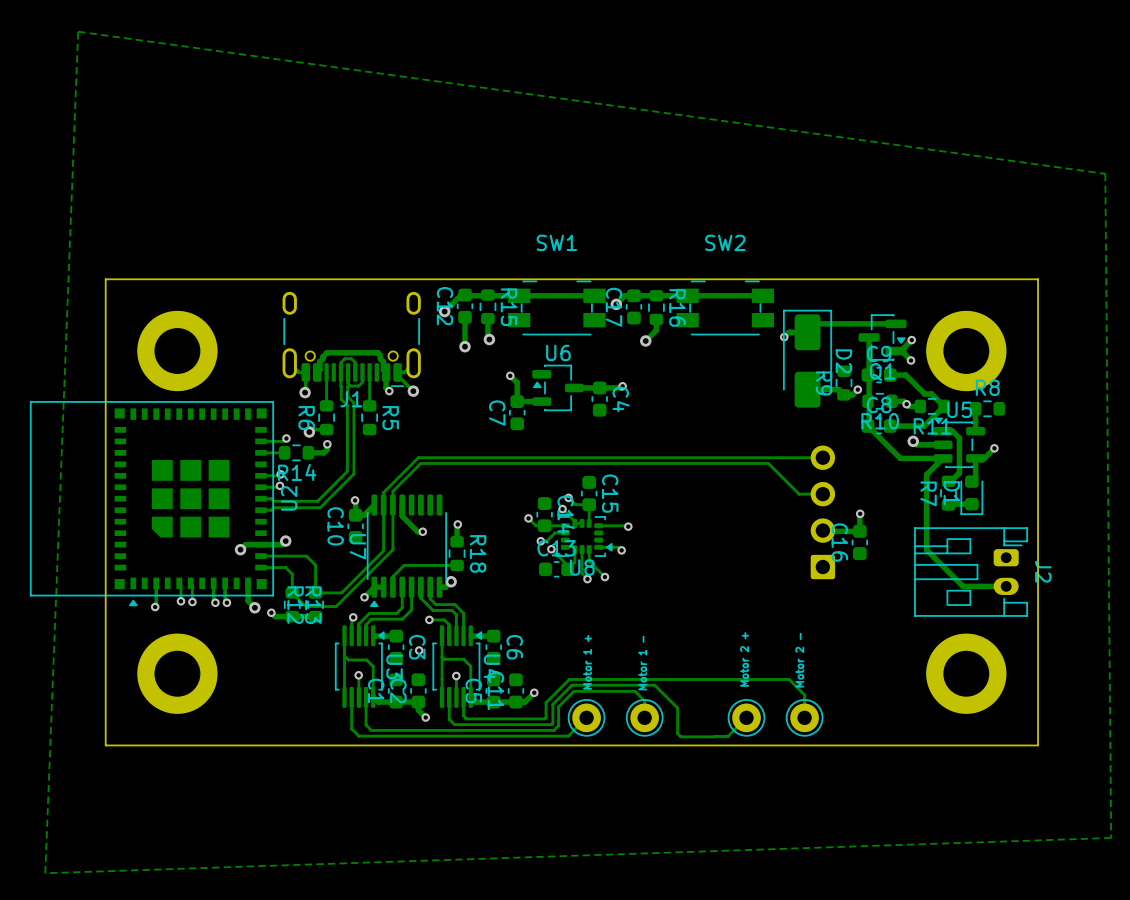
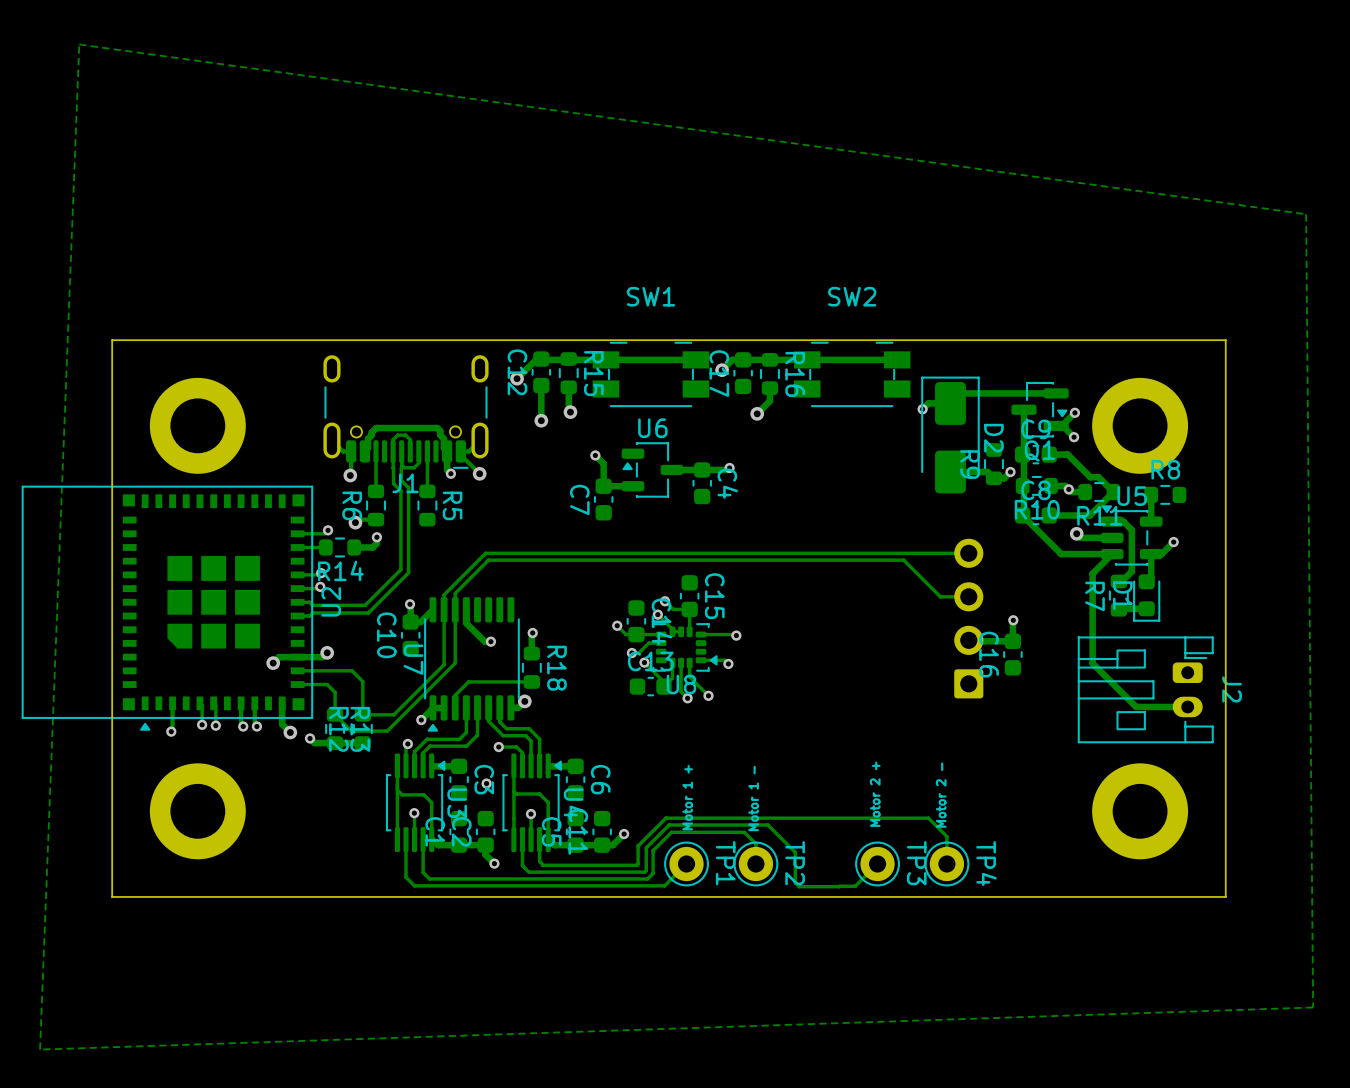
TP1 name: none -> TP1 (725, 863)
TP2 name: none -> TP2 (795, 863)
TP3 name: none -> TP3 (916, 863)
TP4 name: none -> TP4 (986, 863)

